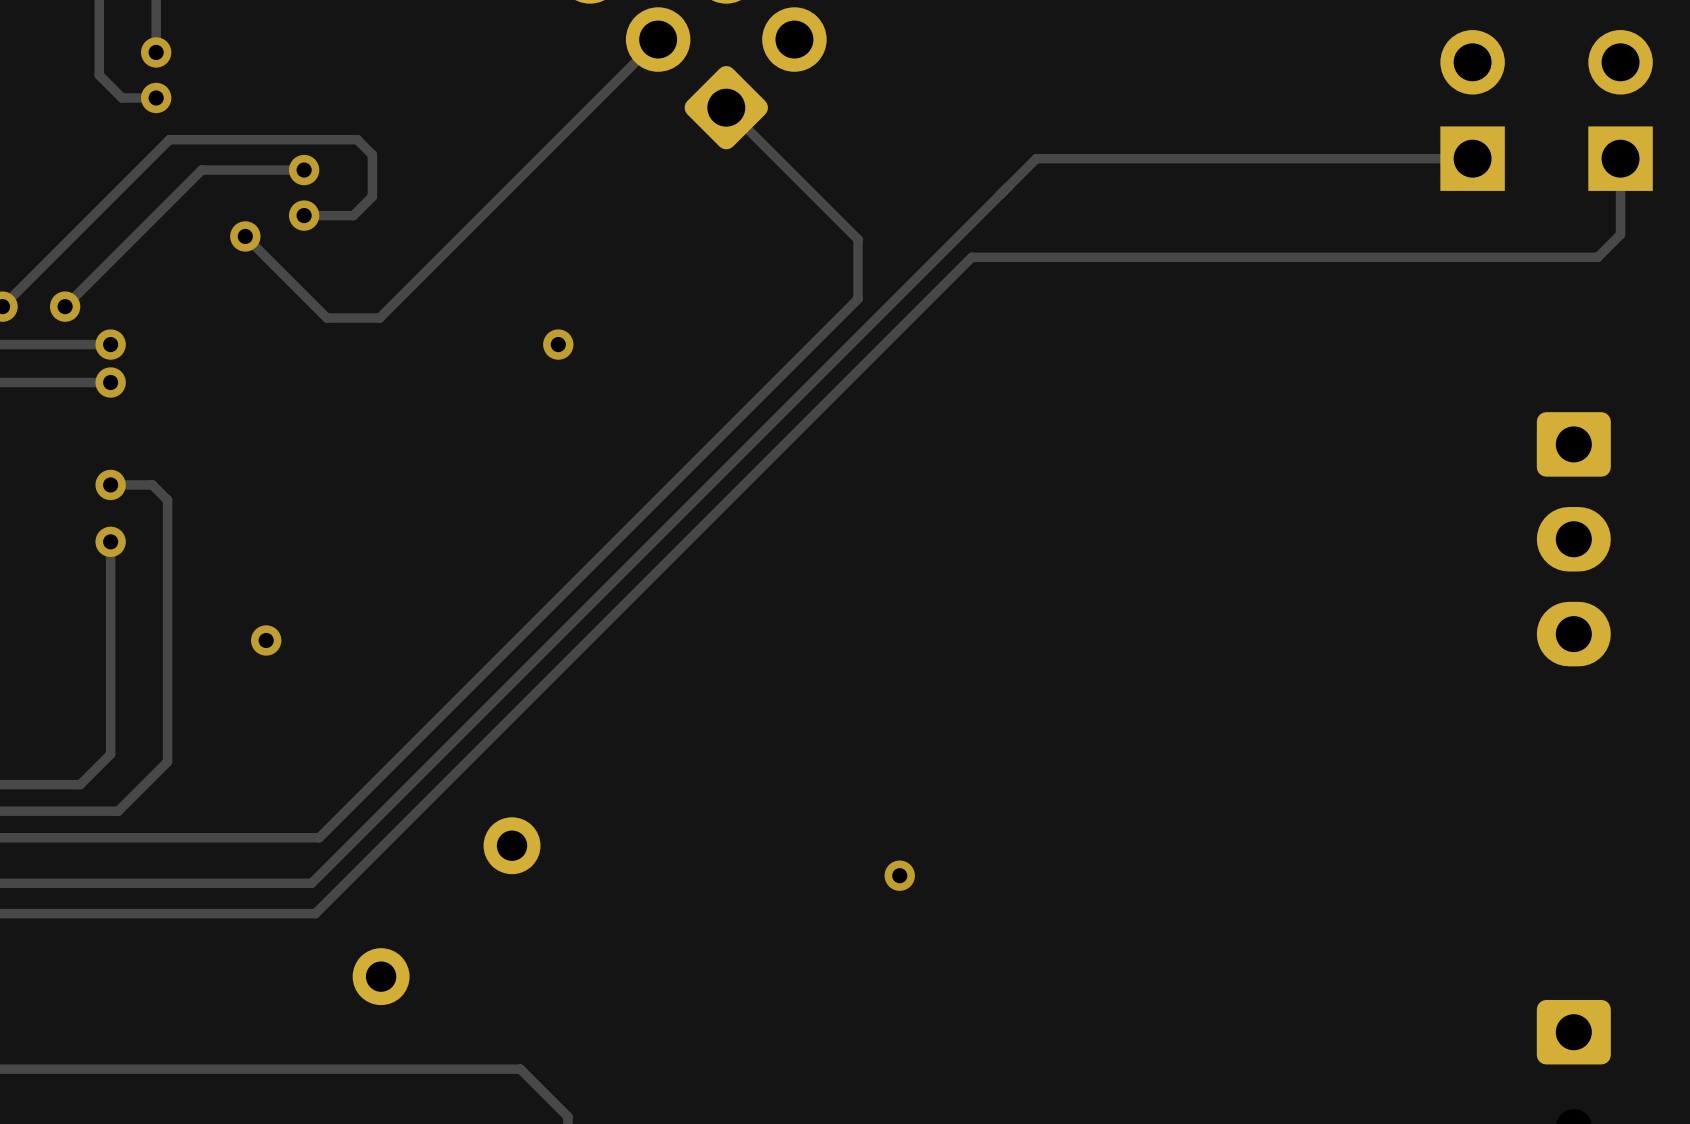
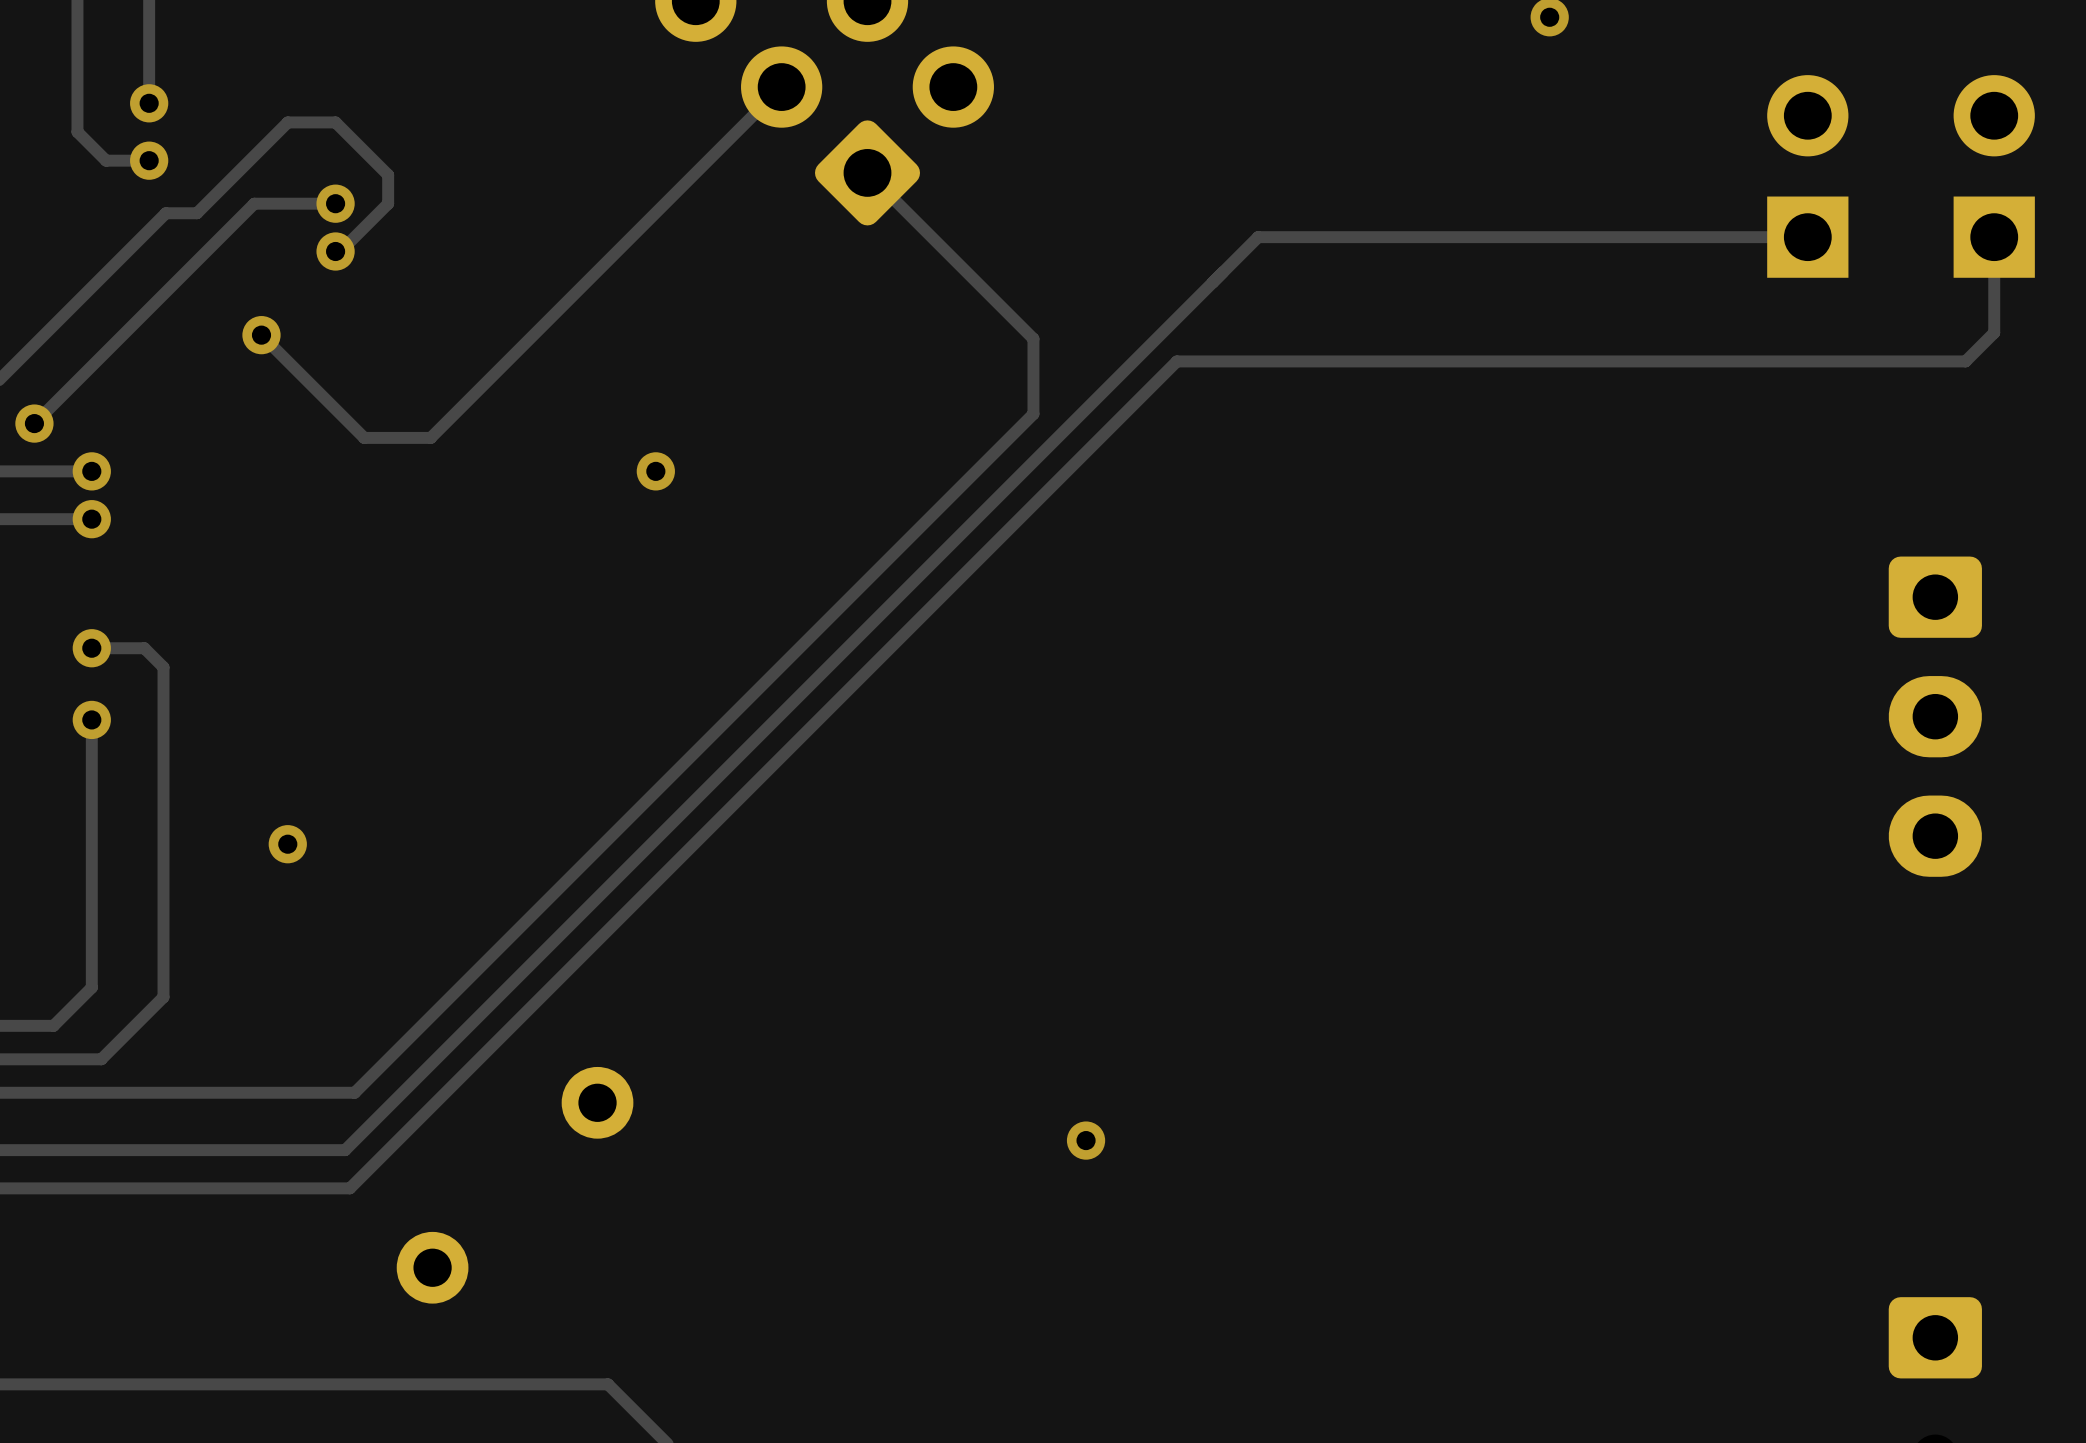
track: (194, 139) (357, 139) (372, 154) (372, 196) (353, 215) (304, 215) -> (196, 213) (287, 122) (335, 122) (388, 175) (388, 203) (335, 256)
track: (304, 170) (201, 170) -> (335, 203) (254, 203) (206, 251)
via position: (304, 215) -> (335, 203)

